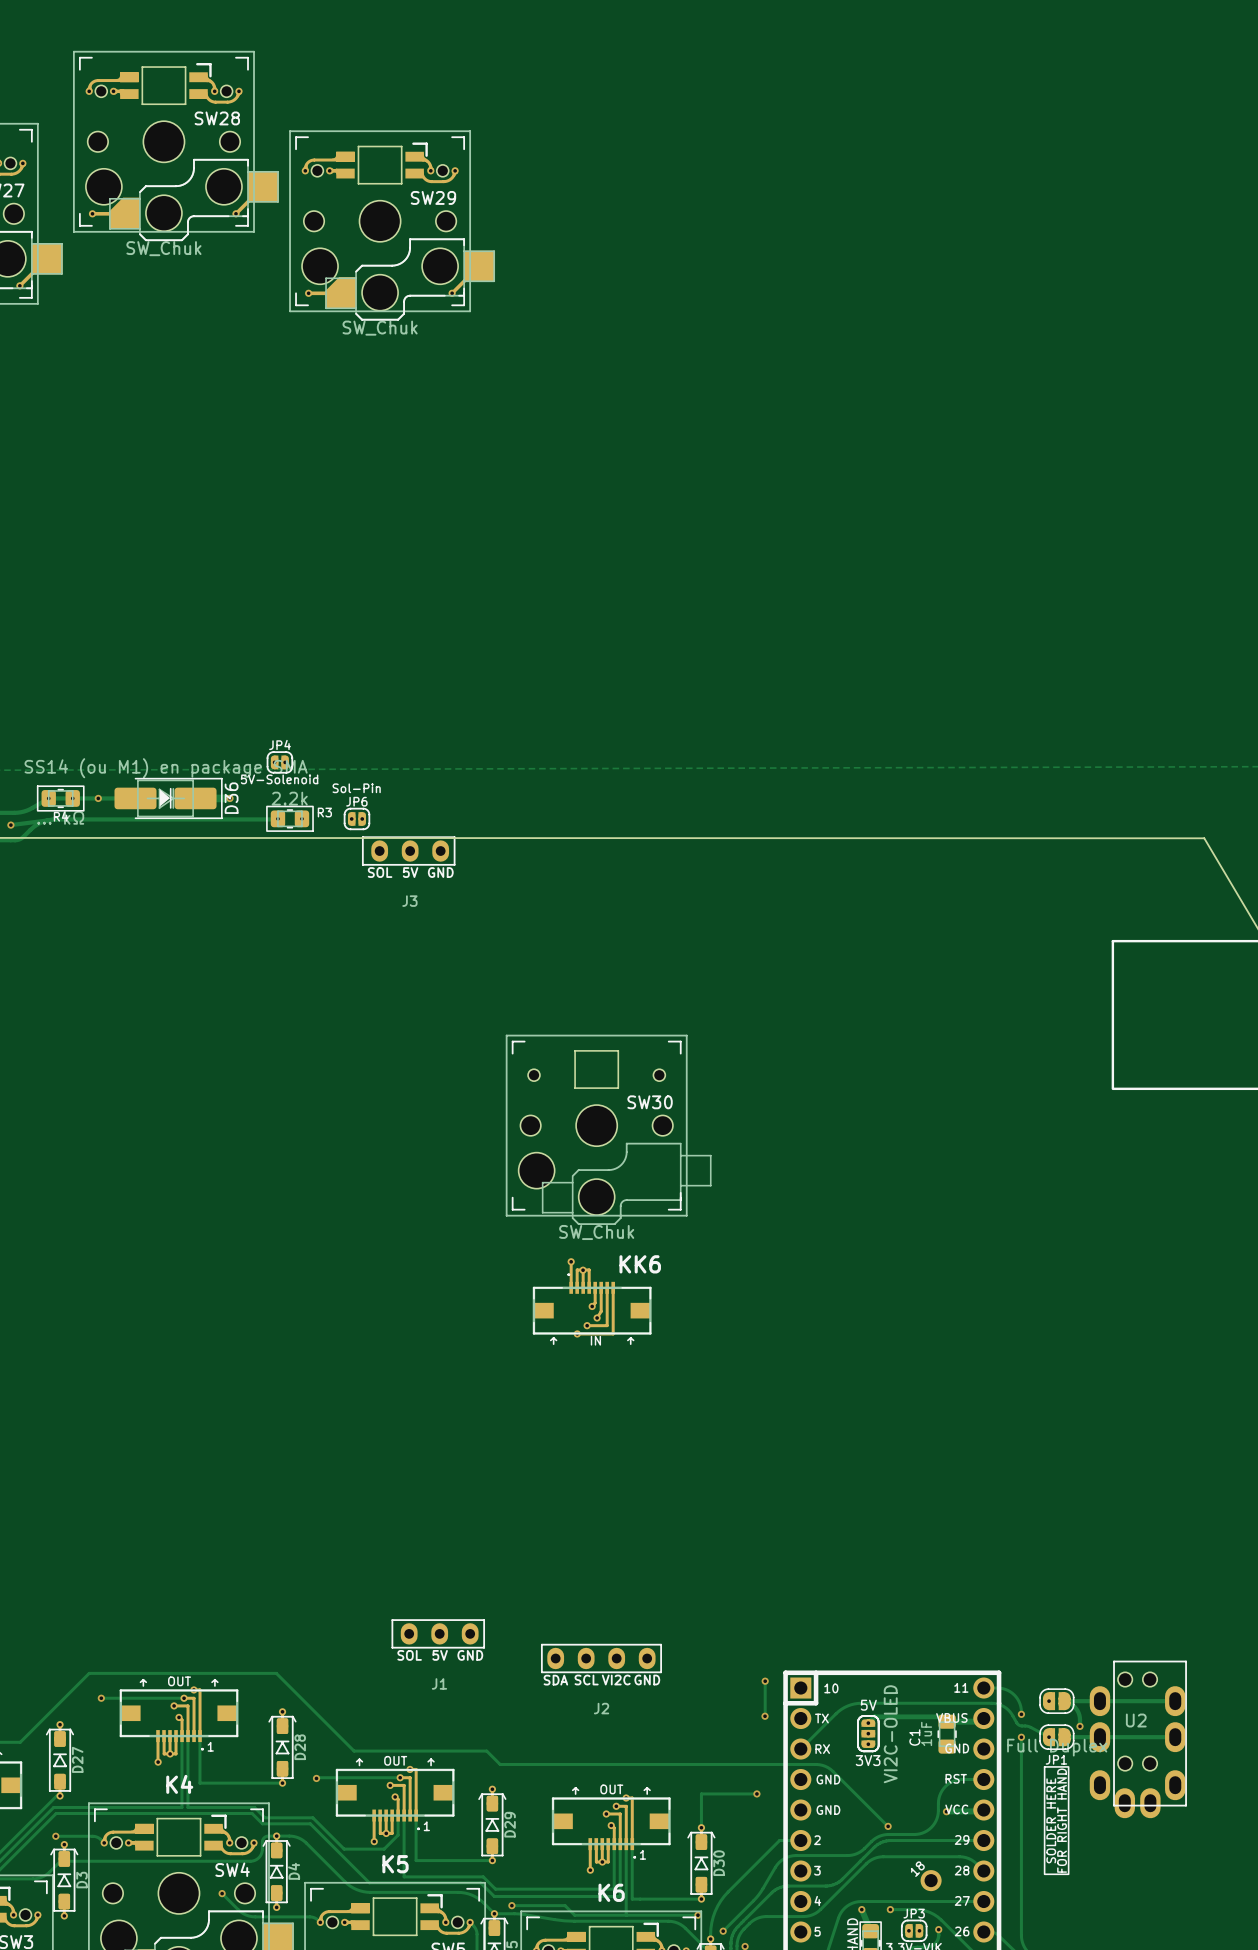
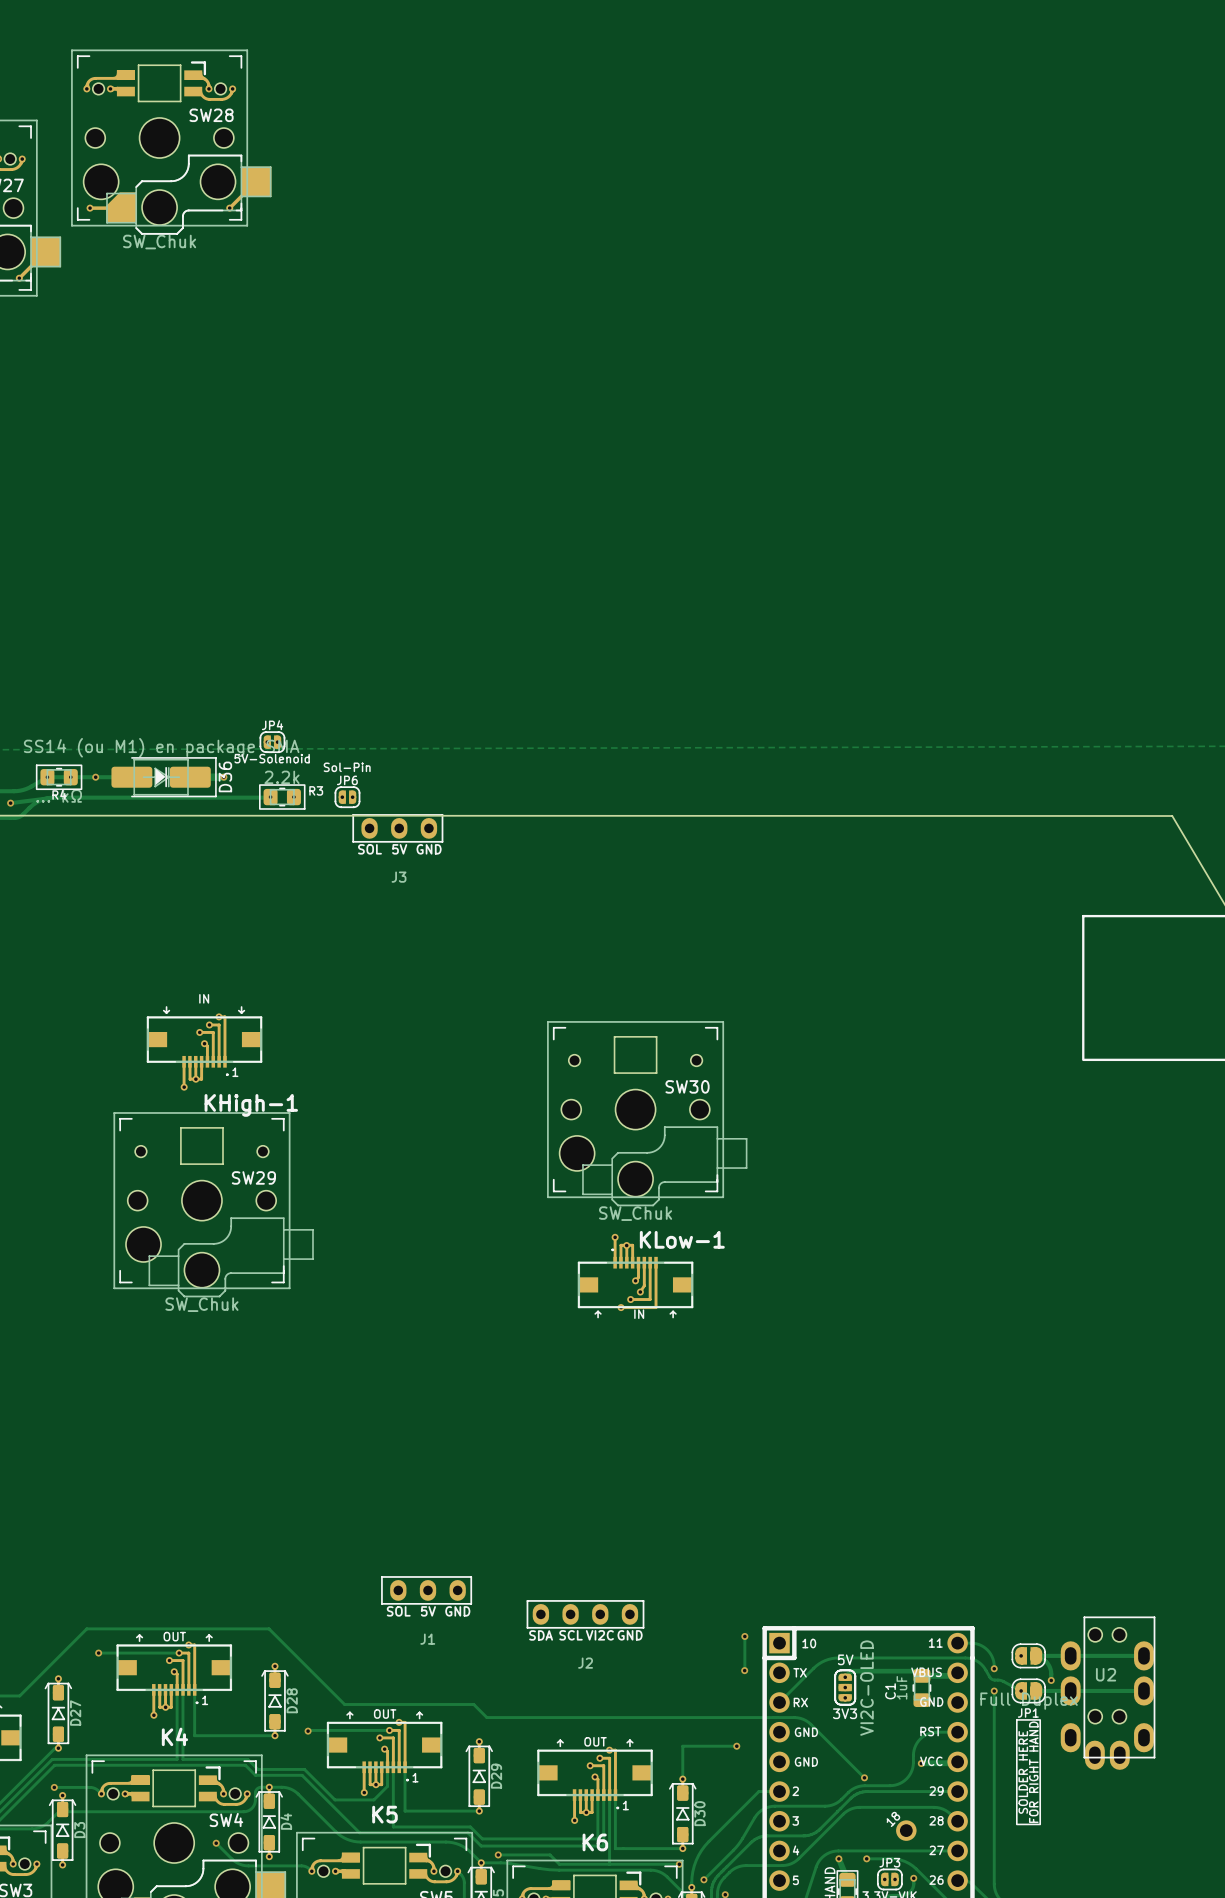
SW29 footprint: [289, 130, 496, 321] -> [113, 1112, 314, 1298]
KHigh-1: none -> (204, 1048)
SW30 position: (608, 1129) -> (647, 1113)
KK6: (592, 1301) -> none
KLow-1: none -> (635, 1275)

